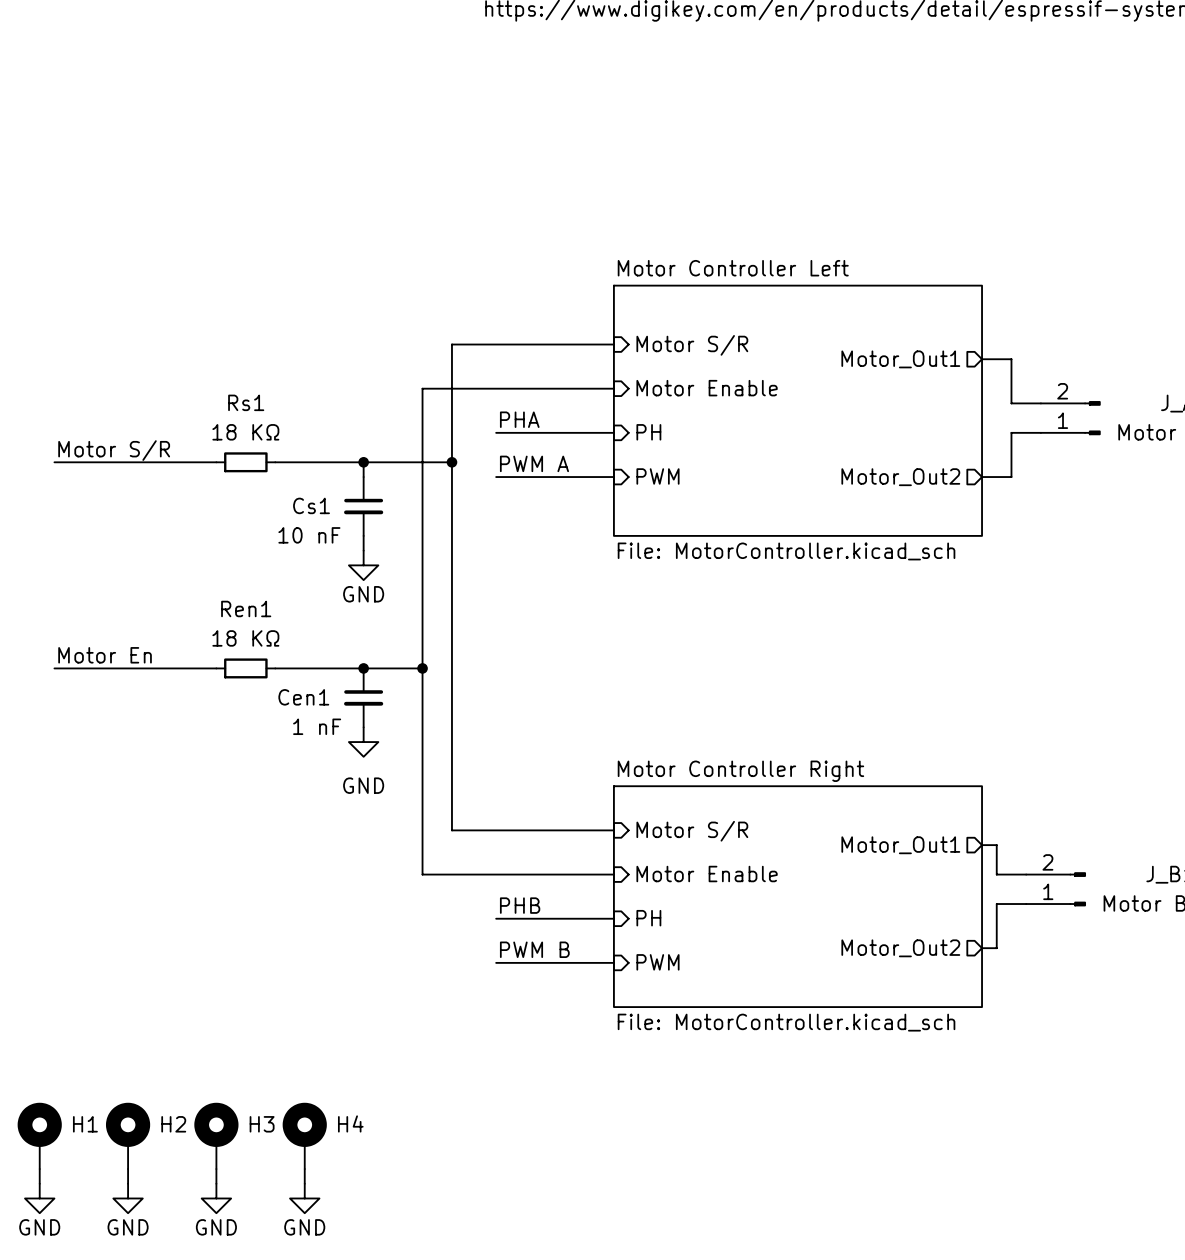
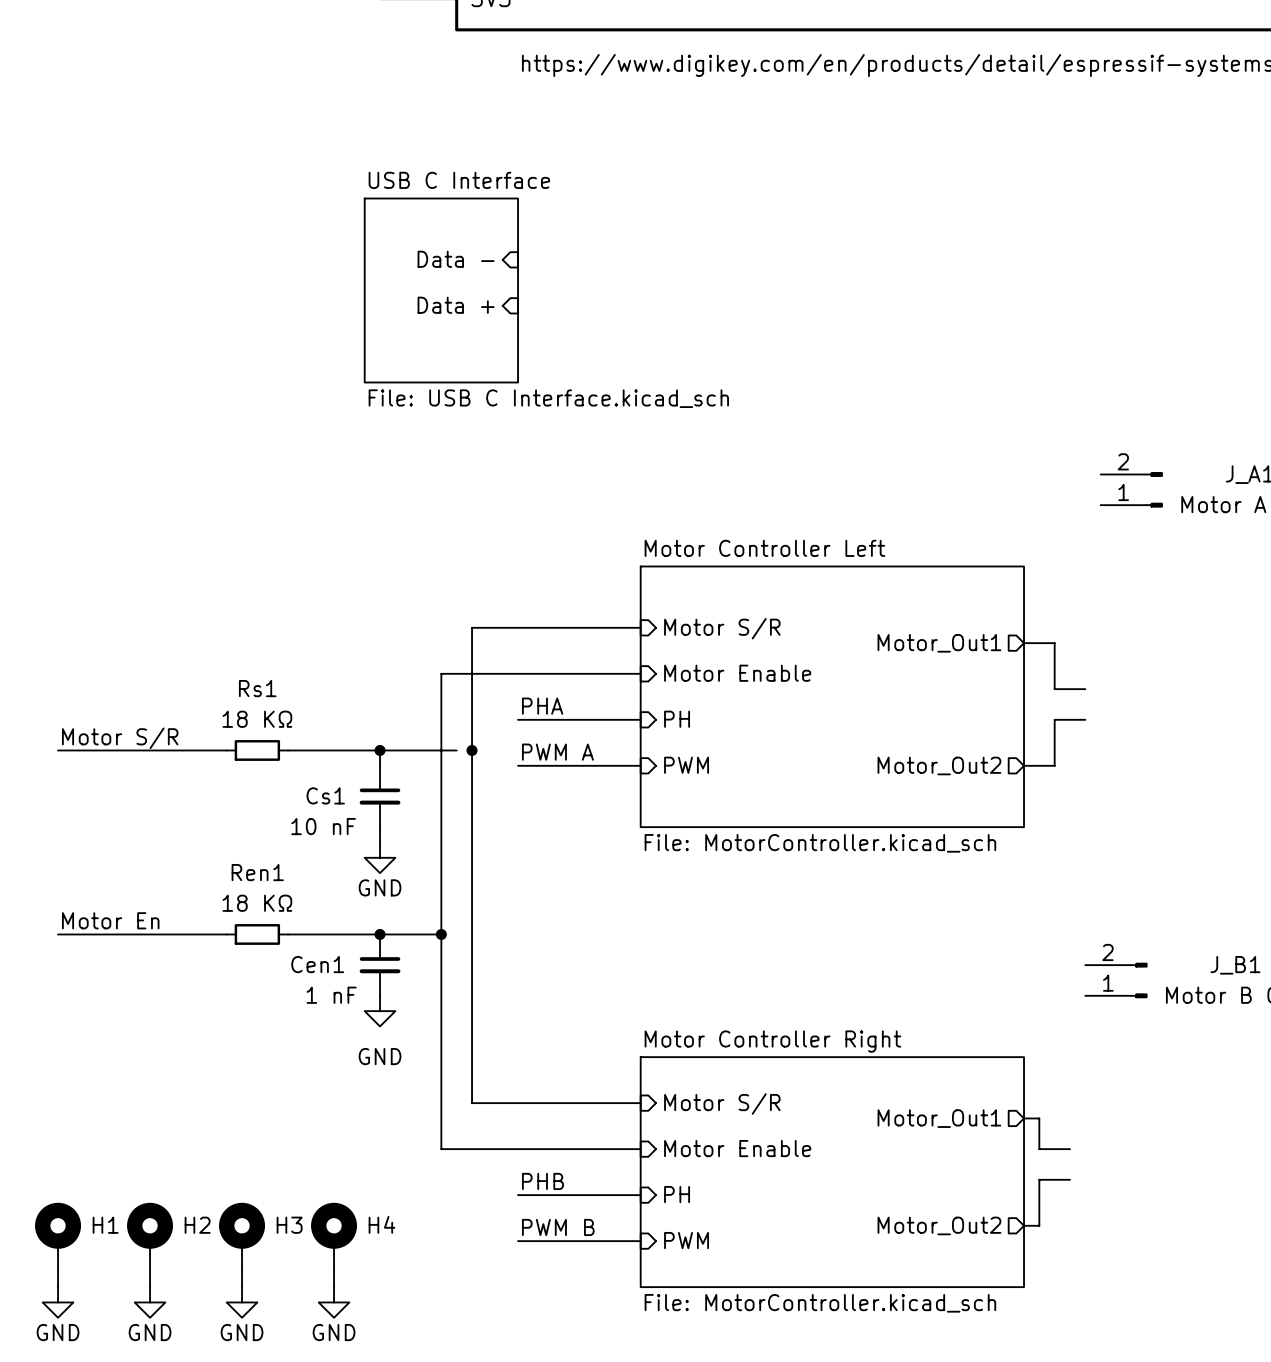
sheet pin: none -> Data - (456, 259)
sheet USB C Interface: none -> File: USB C Interface.kicad_sch (441, 290)
sheet pin: none -> Data + (456, 305)
wire: (613, 344) (451, 344) (451, 830) (613, 830) -> none
sheet pin: Motor S/R (692, 345) -> none
sheet pin: Motor_Out1 (900, 359) -> none
wire: (982, 359) (1011, 359) (1011, 403) (1040, 403) -> (1024, 643) (1054, 643) (1054, 689) (1085, 689)
wire: (613, 388) (422, 388) (422, 874) (613, 874) -> none
sheet pin: Motor Enable (707, 388) -> none
sheet Motor Controller Left position: (797, 410) -> (832, 696)
label position: PHA (519, 419) -> PHA (542, 706)
wire: (496, 432) (613, 432) -> (518, 719) (640, 719)
sheet pin: PH (648, 432) -> none
wire: (1040, 432) (1011, 432) (1011, 477) (982, 477) -> (1085, 719) (1054, 719) (1054, 765) (1024, 765)
label position: Motor S/R (114, 450) -> Motor S/R (120, 738)
wire: (54, 462) (216, 462) -> none
Rs1 position: (245, 462) -> (257, 750)
wire: (275, 462) (451, 462) -> none
wire: (363, 462) (363, 477) -> (380, 750) (380, 765)
junction: (363, 462) -> none
junction: (451, 462) -> none
label position: PWM A (534, 463) -> PWM A (557, 752)
sheet pin: PWM (657, 476) -> none
wire: (496, 477) (613, 477) -> (518, 765) (640, 765)
sheet pin: Motor_Out2 (900, 477) -> none
Cs1 position: (363, 506) -> (380, 796)
wire: (363, 535) (363, 550) -> (380, 827) (380, 842)
wire: none -> (640, 627) (472, 627) (472, 1103) (640, 1103)
sheet pin: none -> Motor S/R (722, 628)
power symbol: GND (363, 565) -> none
sheet pin: none -> Motor_Out1 (939, 643)
wire: none -> (640, 673) (441, 673) (441, 1149) (640, 1149)
sheet pin: none -> Motor Enable (737, 673)
sheet pin: none -> PH (677, 719)
label position: Motor En (105, 655) -> Motor En (110, 920)
wire: none -> (58, 750) (73, 750)
Ren1 position: (245, 668) -> (257, 934)
junction position: (363, 668) -> (380, 750)
junction position: (422, 668) -> (472, 750)
sheet pin: none -> PWM (686, 765)
sheet pin: none -> Motor_Out2 (939, 765)
Cen1 position: (363, 697) -> (380, 965)
power symbol position: GND (363, 742) -> GND (380, 857)
power symbol text position: GND (363, 785) -> GND (380, 887)
sheet pin: Motor S/R (692, 831) -> none
wire: none -> (58, 934) (226, 934)
wire: none -> (288, 934) (441, 934)
junction: none -> (380, 934)
junction: none -> (441, 934)
sheet pin: Motor_Out1 (900, 845) -> none
wire: (982, 845) (996, 845) (996, 874) (1026, 874) -> (1024, 1118) (1039, 1118) (1039, 1149) (1070, 1149)
sheet pin: Motor Enable (707, 874) -> none
sheet Motor Controller Right position: (797, 896) -> (832, 1172)
wire: (1026, 904) (996, 904) (996, 948) (982, 948) -> (1070, 1179) (1039, 1179) (1039, 1225) (1024, 1225)
label position: PHB (520, 905) -> PHB (542, 1181)
power symbol: none -> GND (380, 1011)
wire: (496, 918) (613, 918) -> (518, 1195) (640, 1195)
sheet pin: PH (648, 918) -> none
sheet pin: Motor_Out2 (900, 948) -> none
label position: PWM B (534, 949) -> PWM B (558, 1227)
wire: (496, 962) (613, 962) -> (518, 1241) (640, 1241)
sheet pin: PWM (657, 962) -> none
sheet pin: none -> Motor S/R (722, 1104)
sheet pin: none -> Motor_Out1 (939, 1118)
sheet pin: none -> Motor Enable (737, 1148)
sheet pin: none -> PH (677, 1194)
sheet pin: none -> Motor_Out2 (939, 1225)
sheet pin: none -> PWM (686, 1240)

